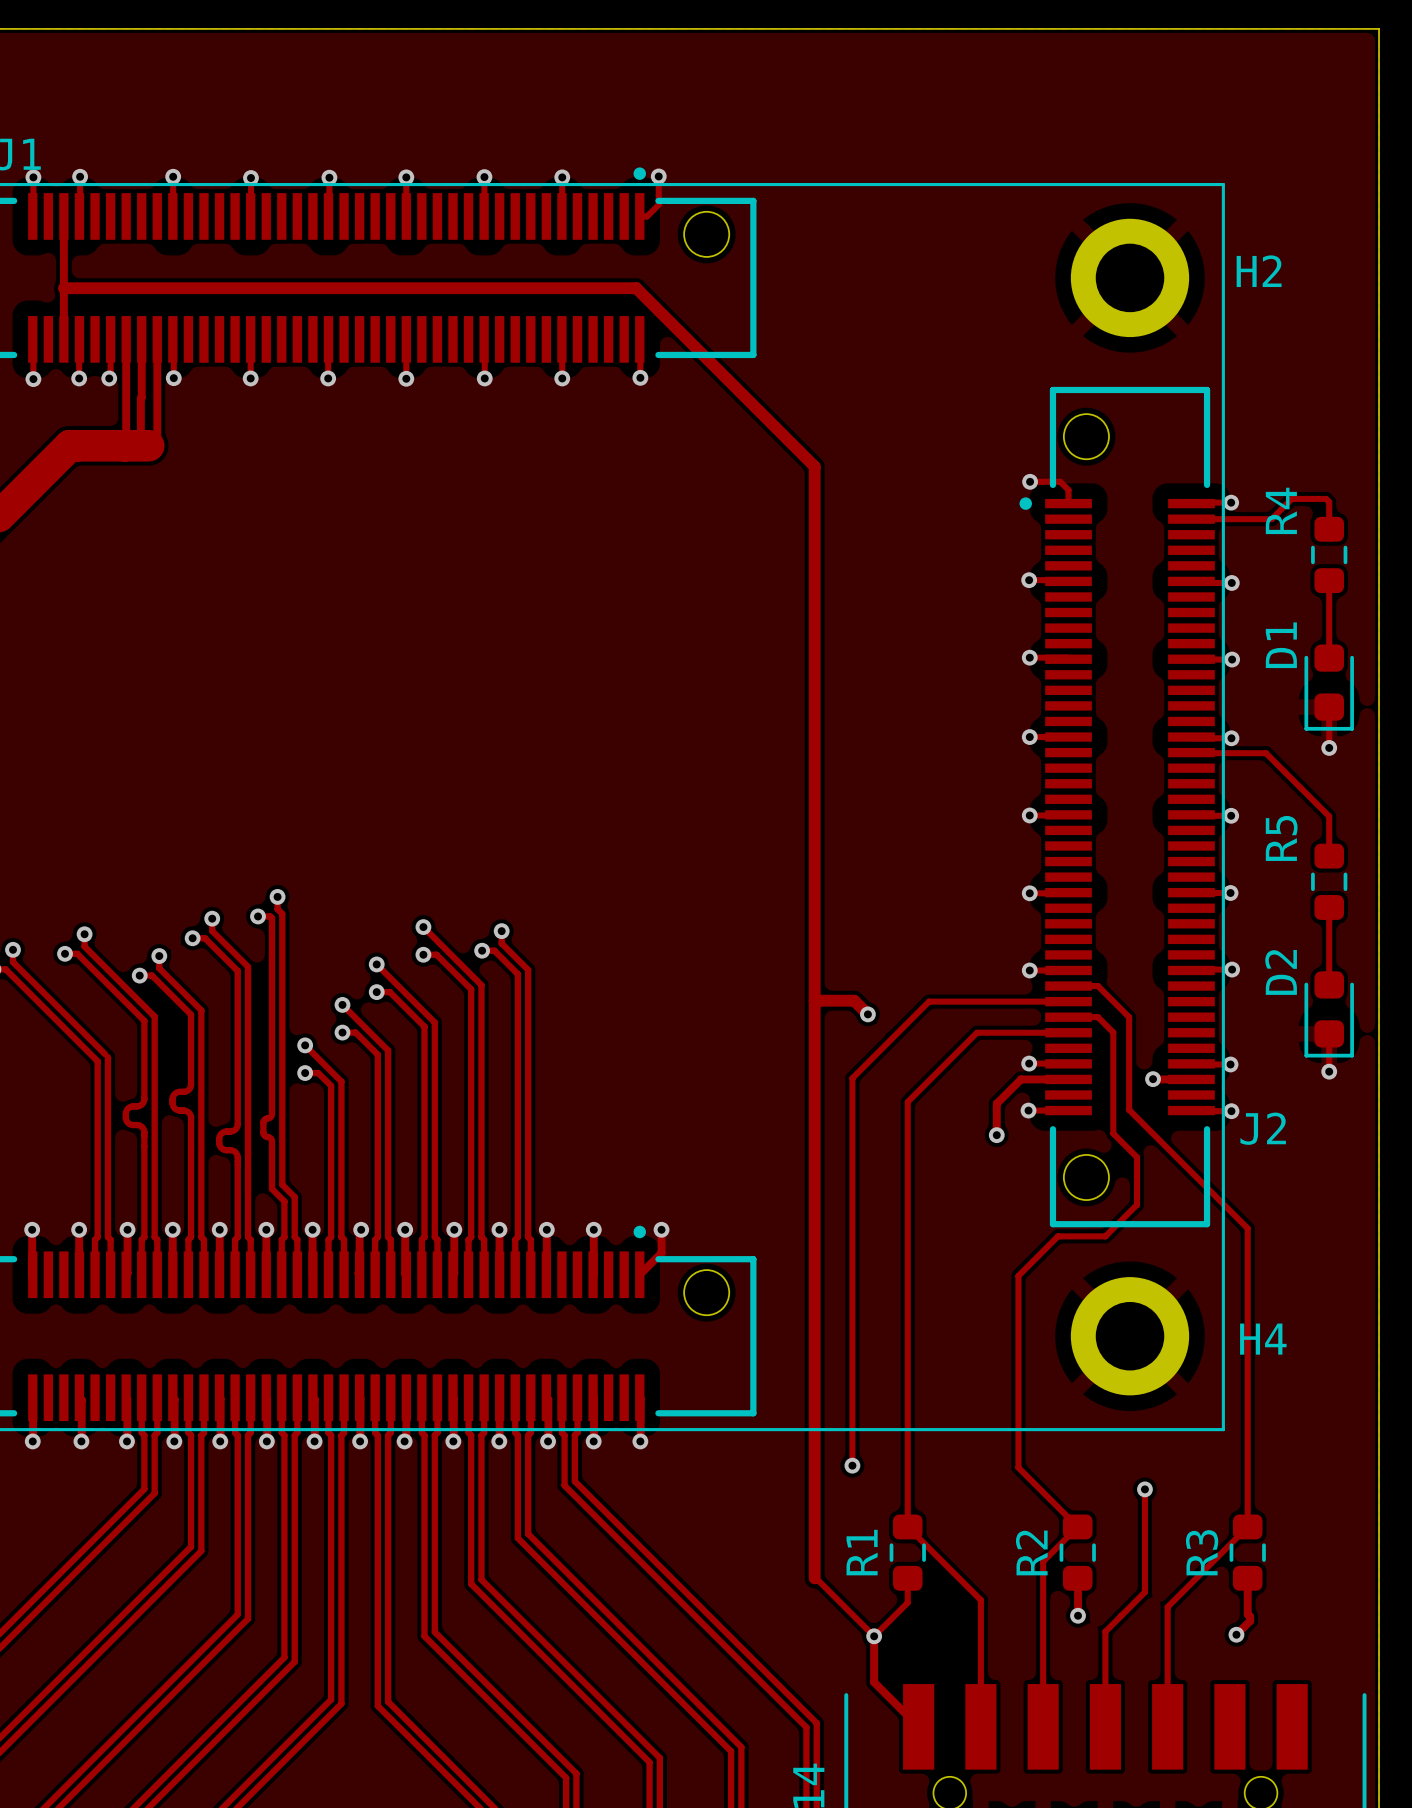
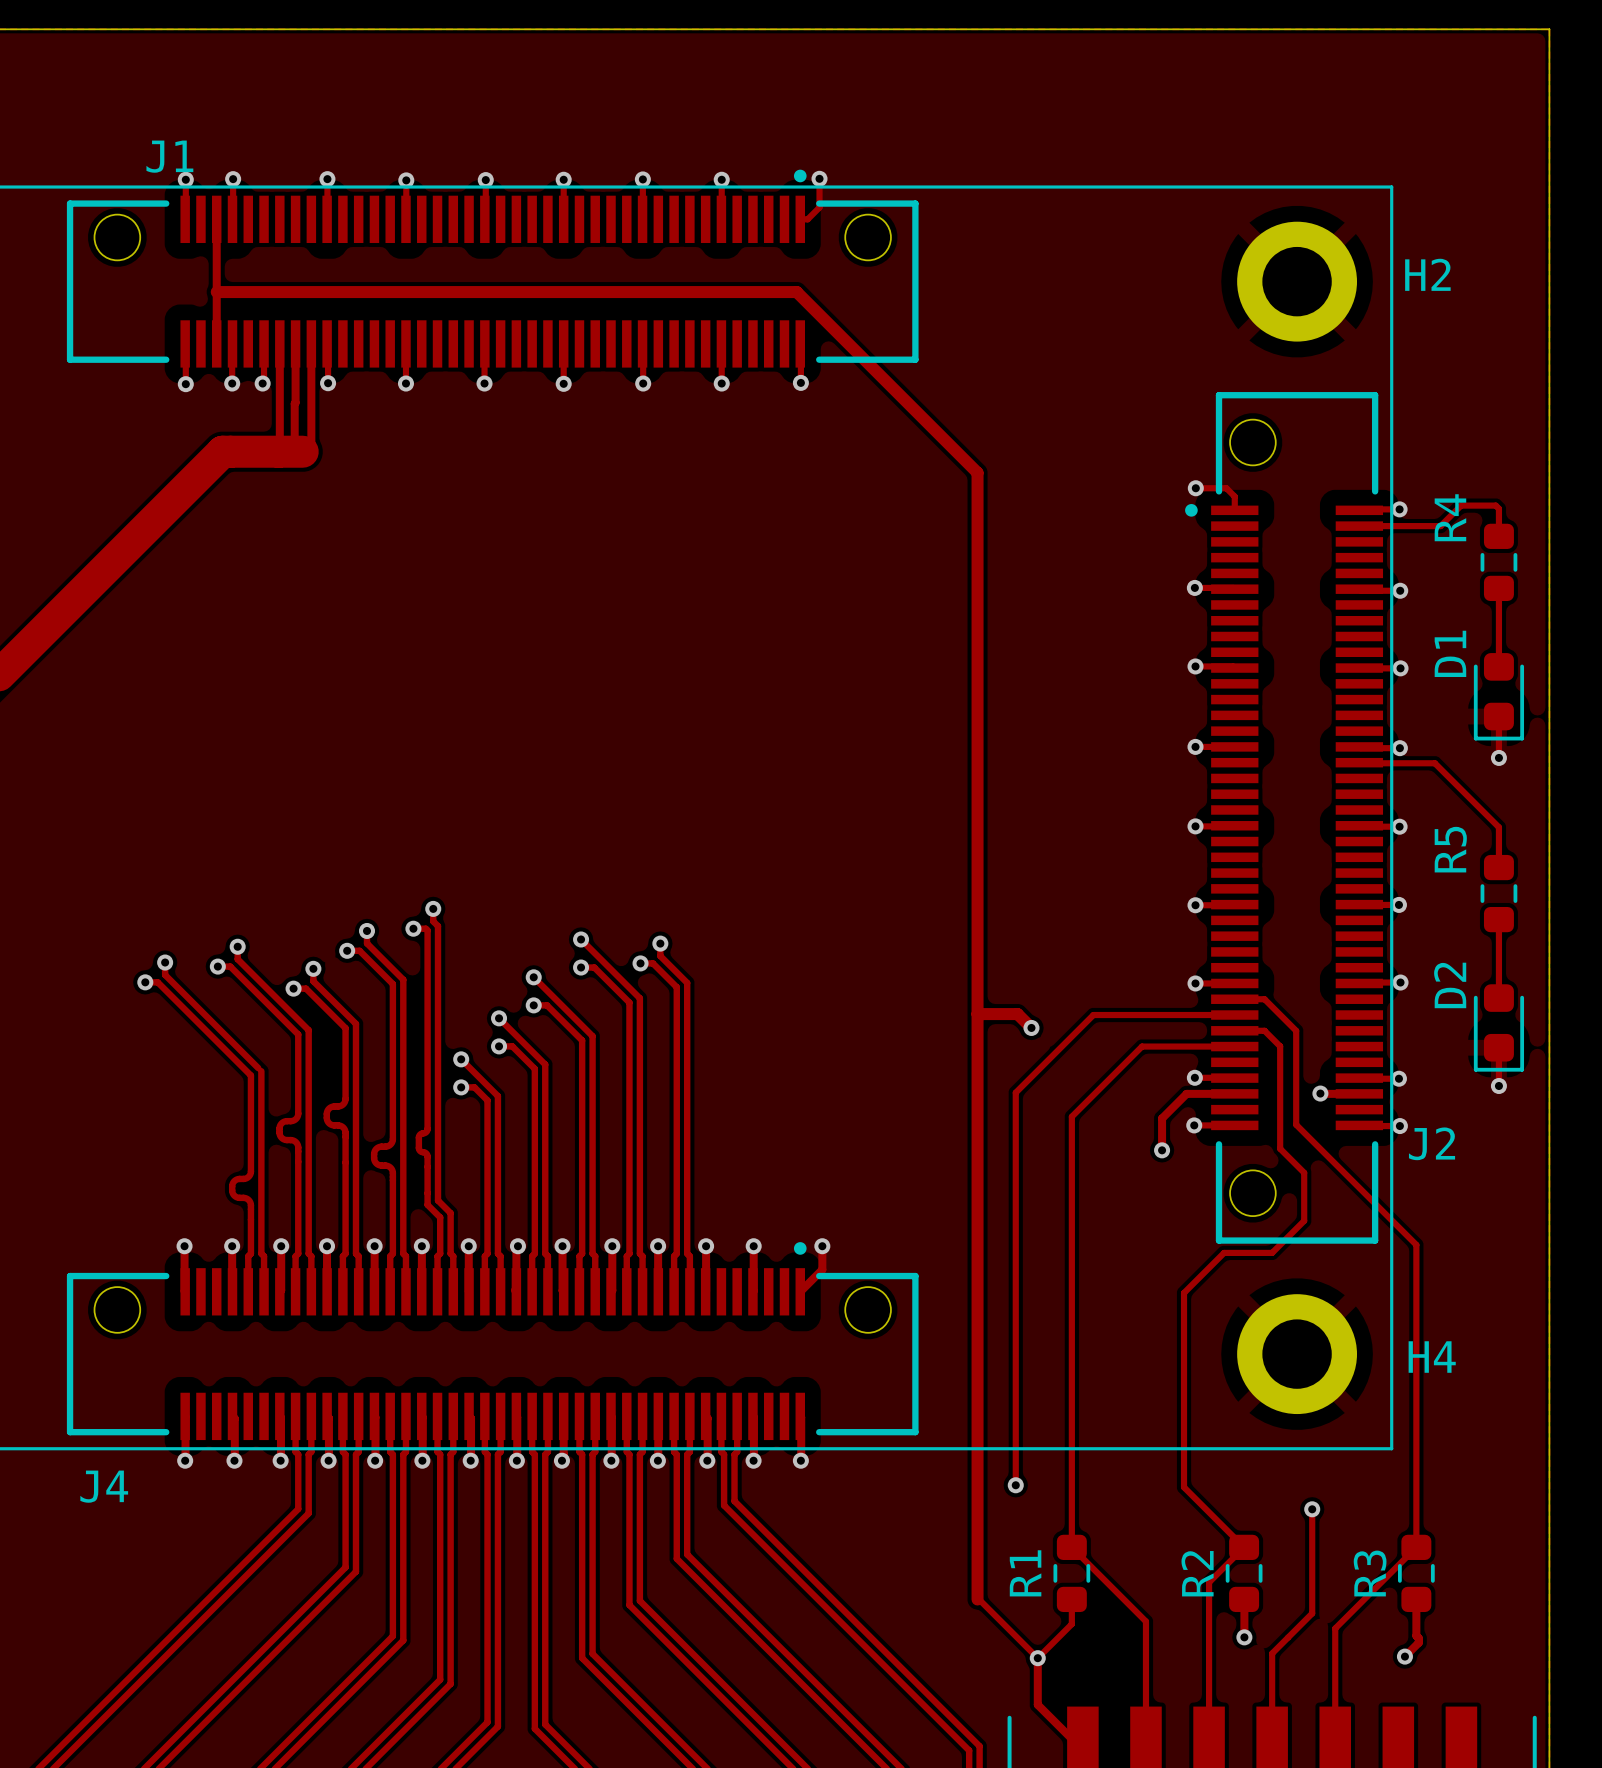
track: (97, 1155) (97, 1189) -> (250, 1171) (247, 1177) (235, 1180) (232, 1186) (234, 1195) (247, 1199) (250, 1205)

